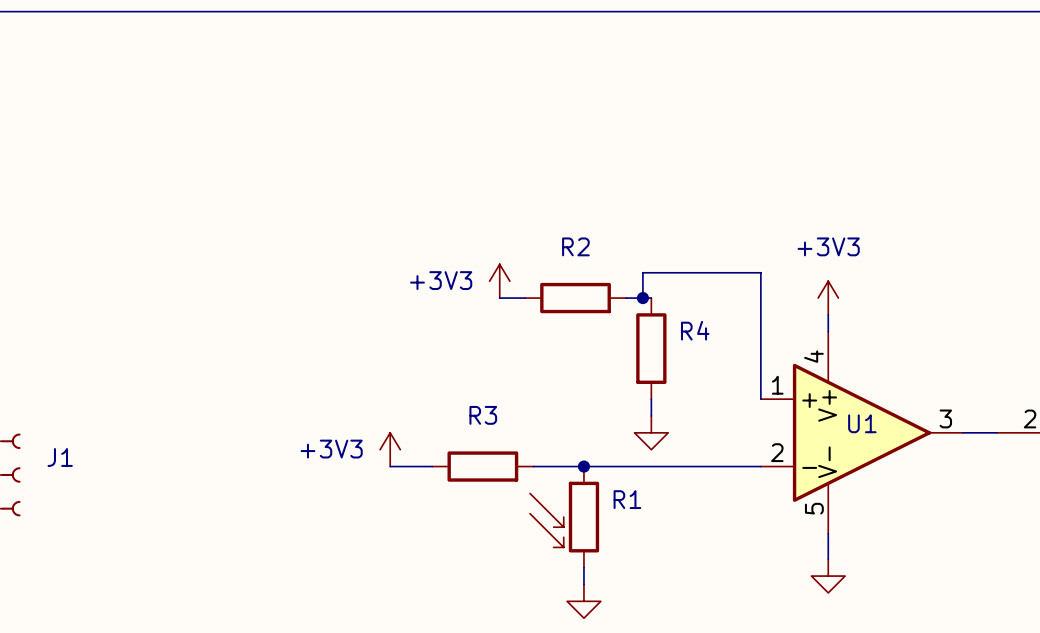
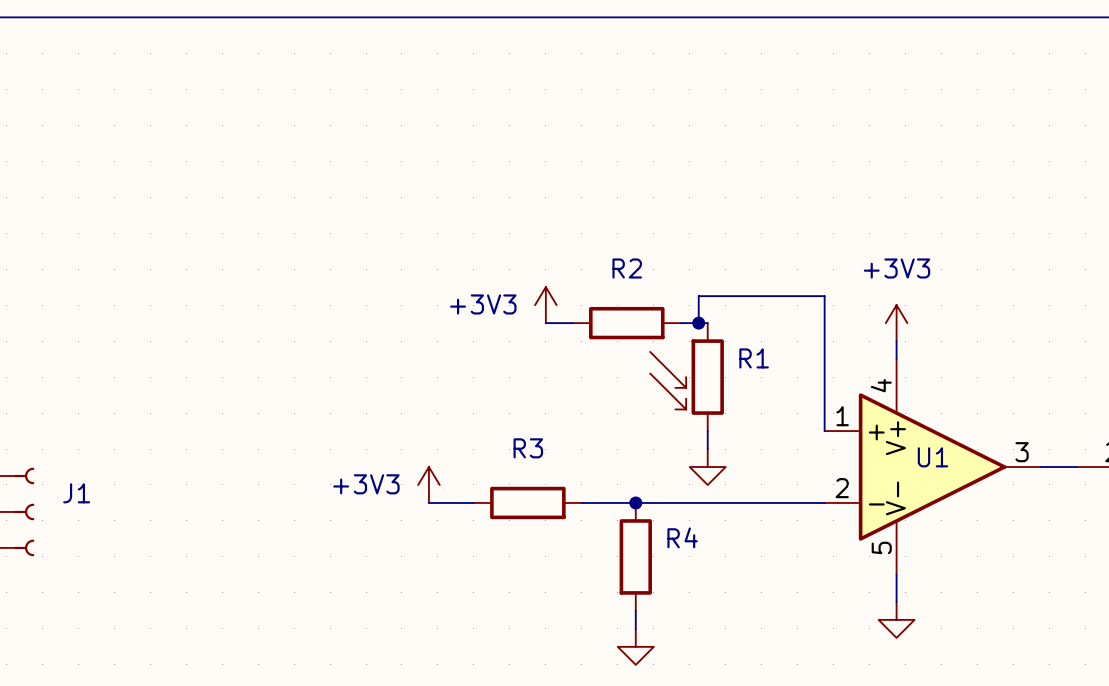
R4 position: (651, 348) -> (635, 556)
R1 position: (564, 517) -> (687, 377)

